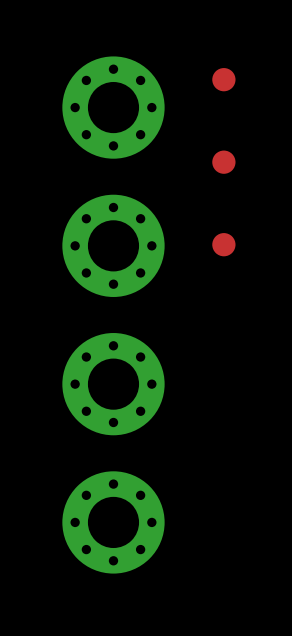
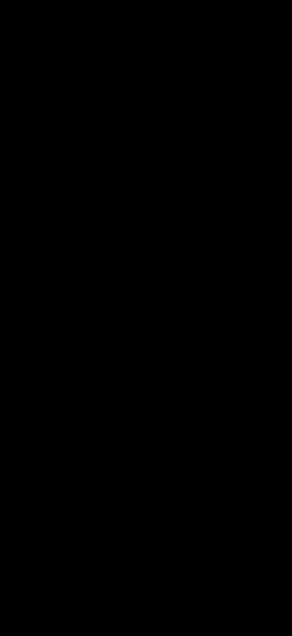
part: (223, 79) -> none
part: (113, 107) -> none
part: (223, 162) -> none
part: (223, 244) -> none
part: (113, 245) -> none
part: (113, 384) -> none
part: (113, 522) -> none

